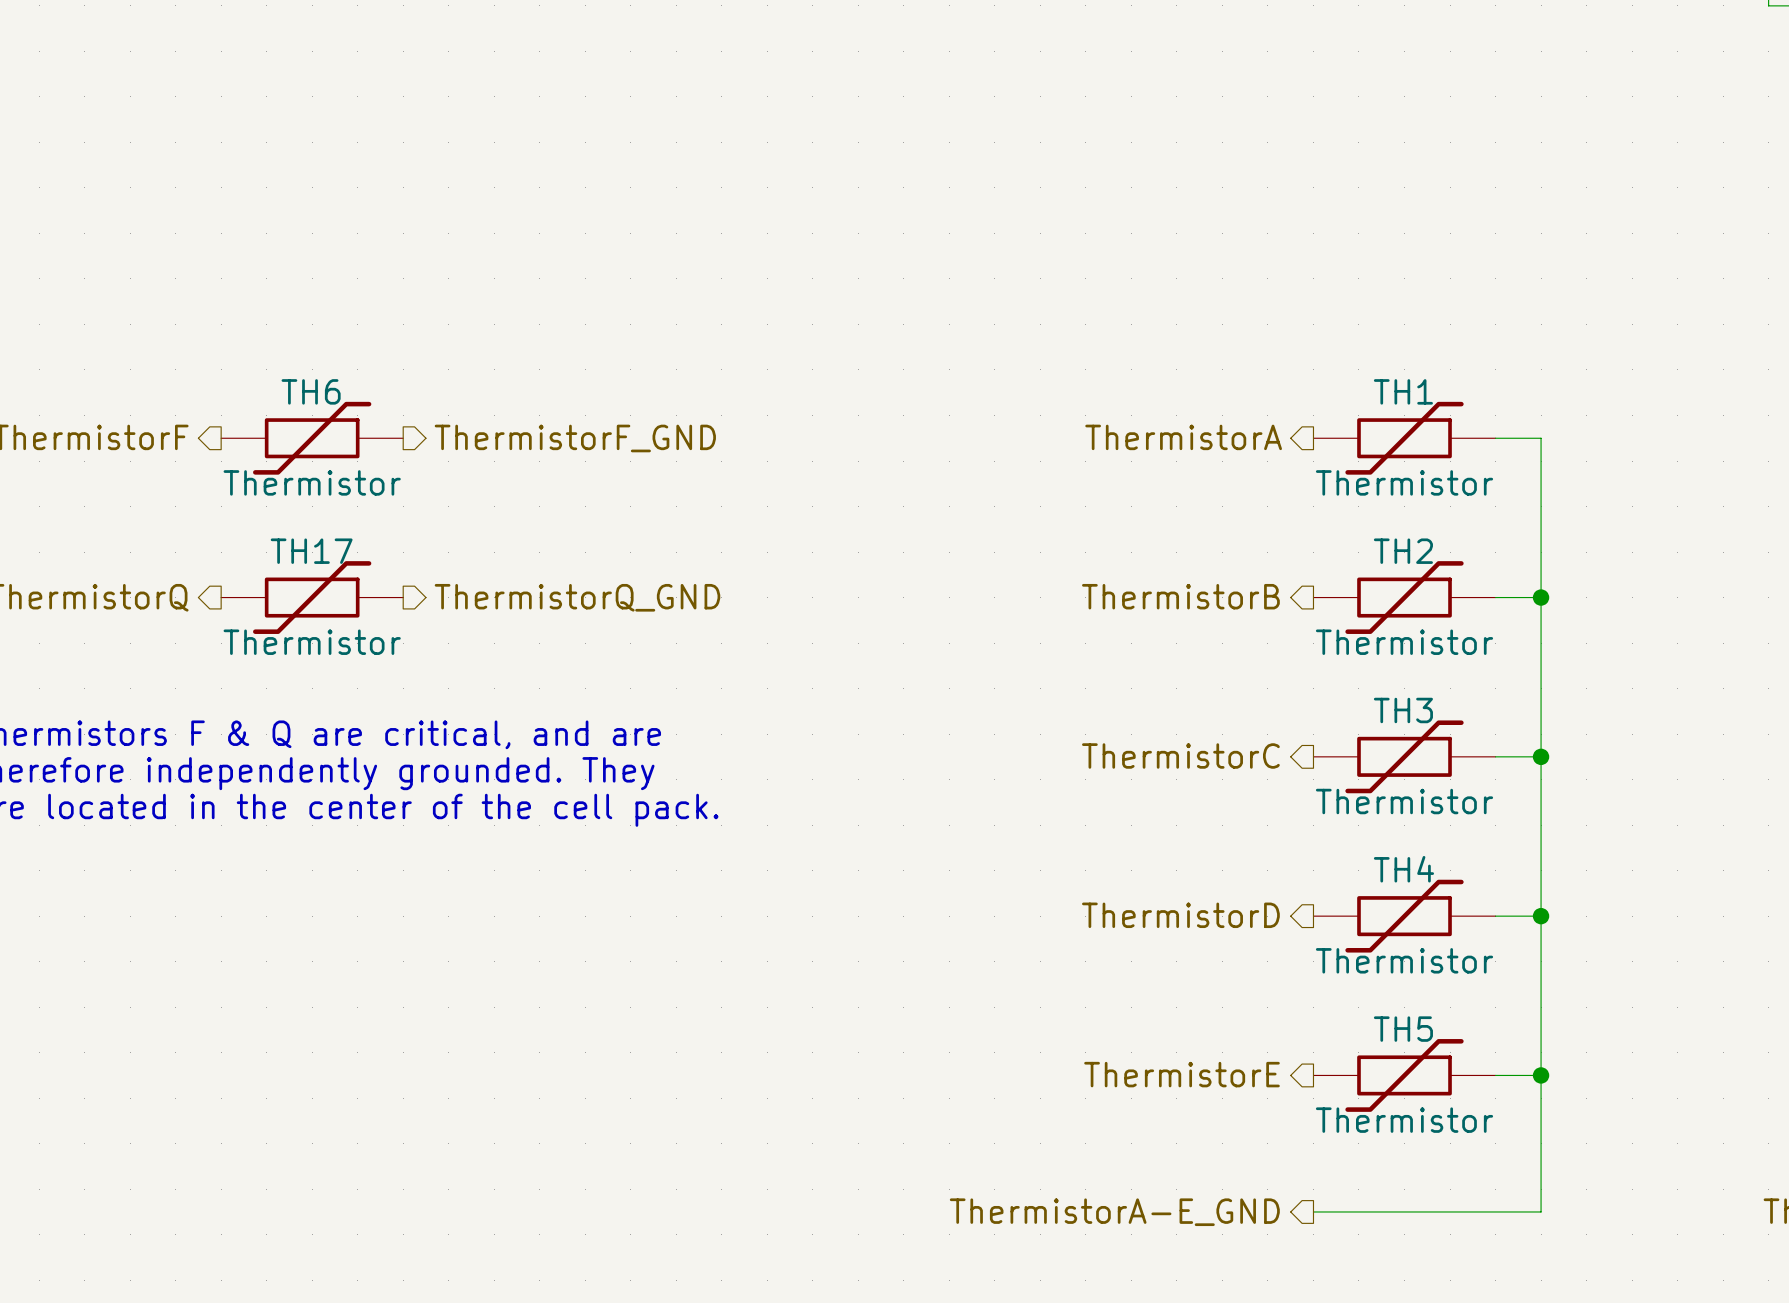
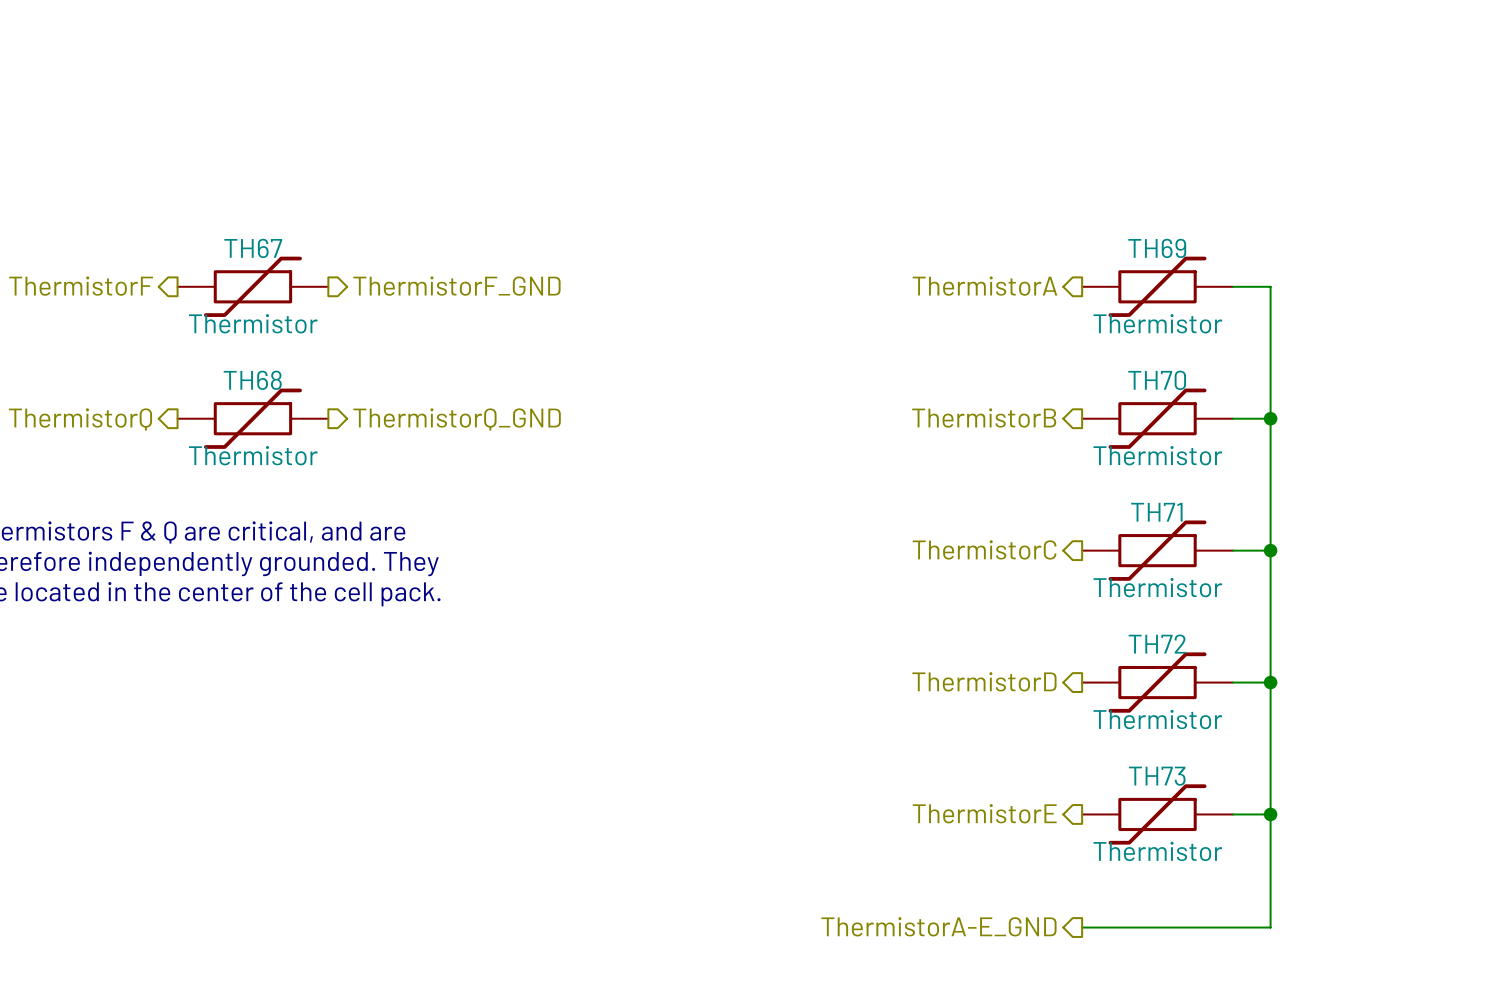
TH6 name: TH6 (311, 391) -> TH67 (253, 248)
TH1 name: TH1 (1403, 391) -> TH69 (1157, 248)
TH17 name: TH17 (311, 551) -> TH68 (252, 380)
TH2 name: TH2 (1403, 551) -> TH70 (1157, 380)
TH3 name: TH3 (1403, 710) -> TH71 (1156, 512)
TH4 name: TH4 (1403, 869) -> TH72 (1157, 644)
TH5 name: TH5 (1403, 1029) -> TH73 (1157, 776)

